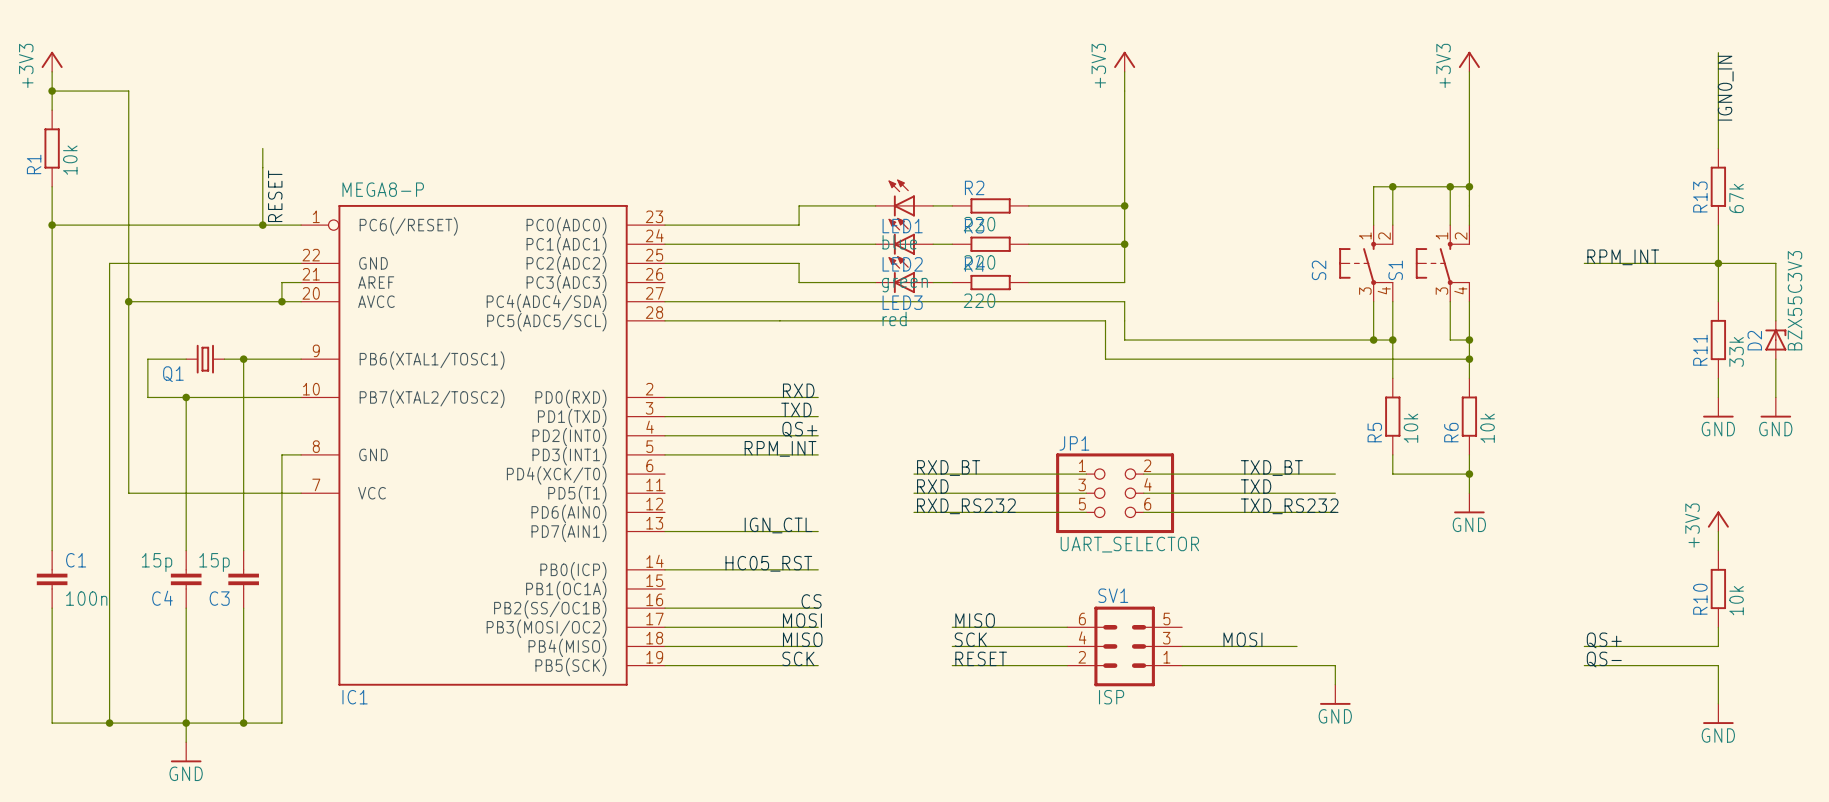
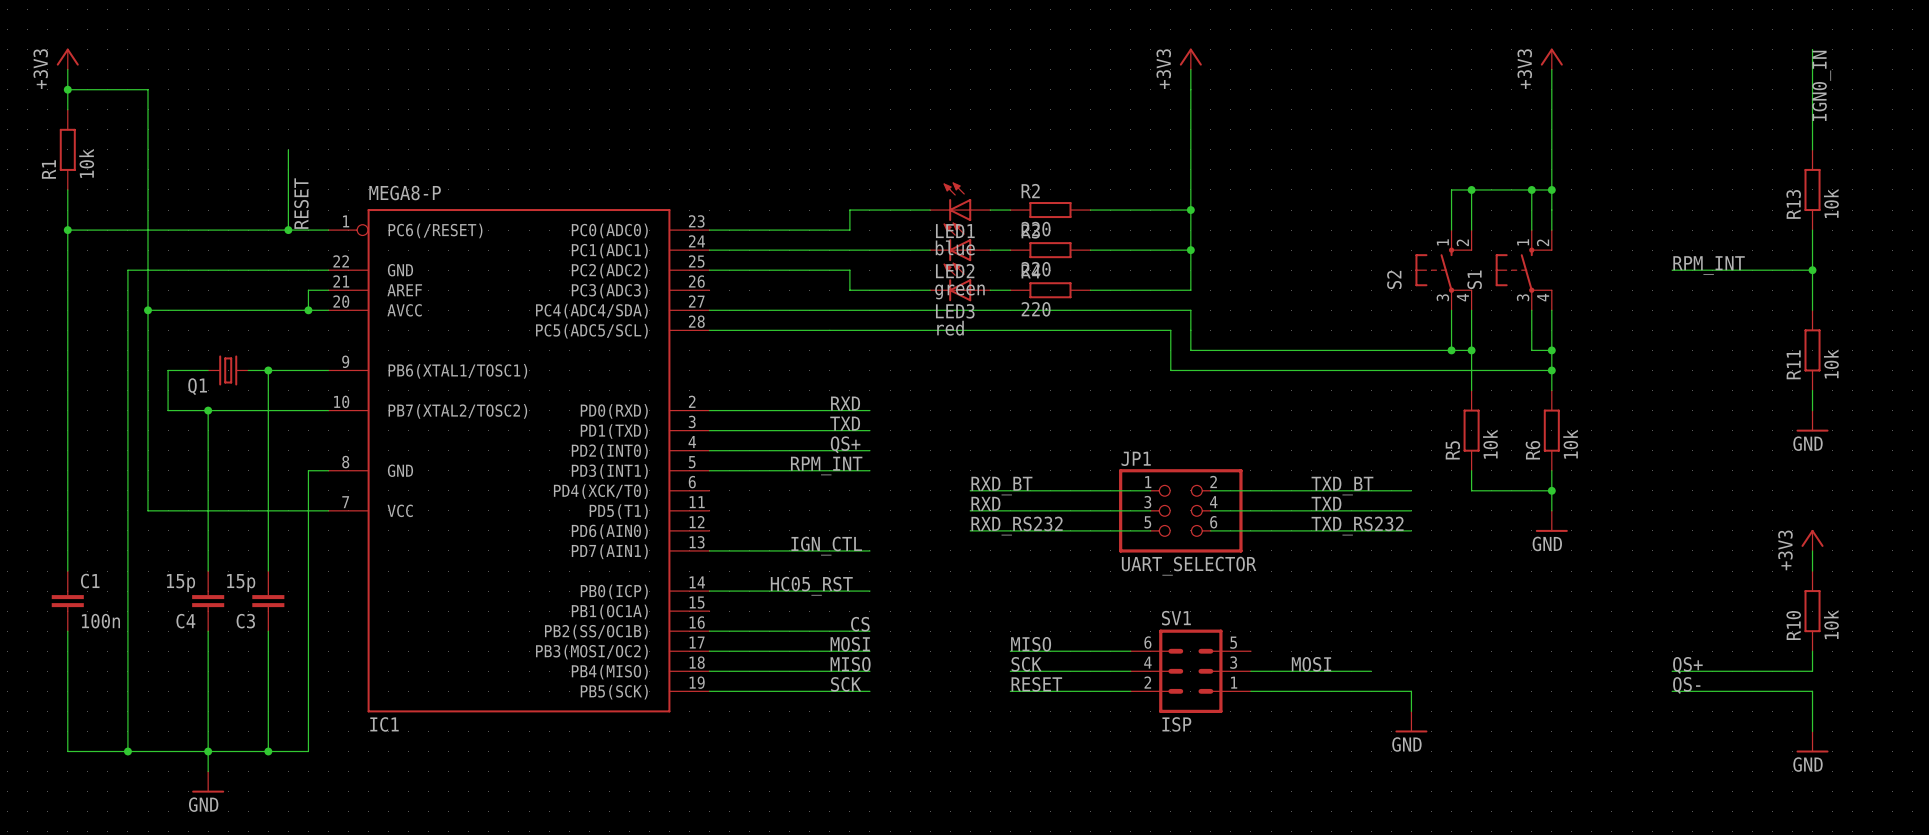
R13 value: 67k (1736, 198) -> 10k (1831, 203)
wire: (1718, 263) (1775, 263) (1775, 320) -> none
D2: BZX55C3V3 (1775, 340) -> none
R11 value: 33k (1736, 351) -> 10k (1831, 363)
wire: (1775, 359) (1775, 397) -> none
power symbol: GND (1775, 407) -> none

